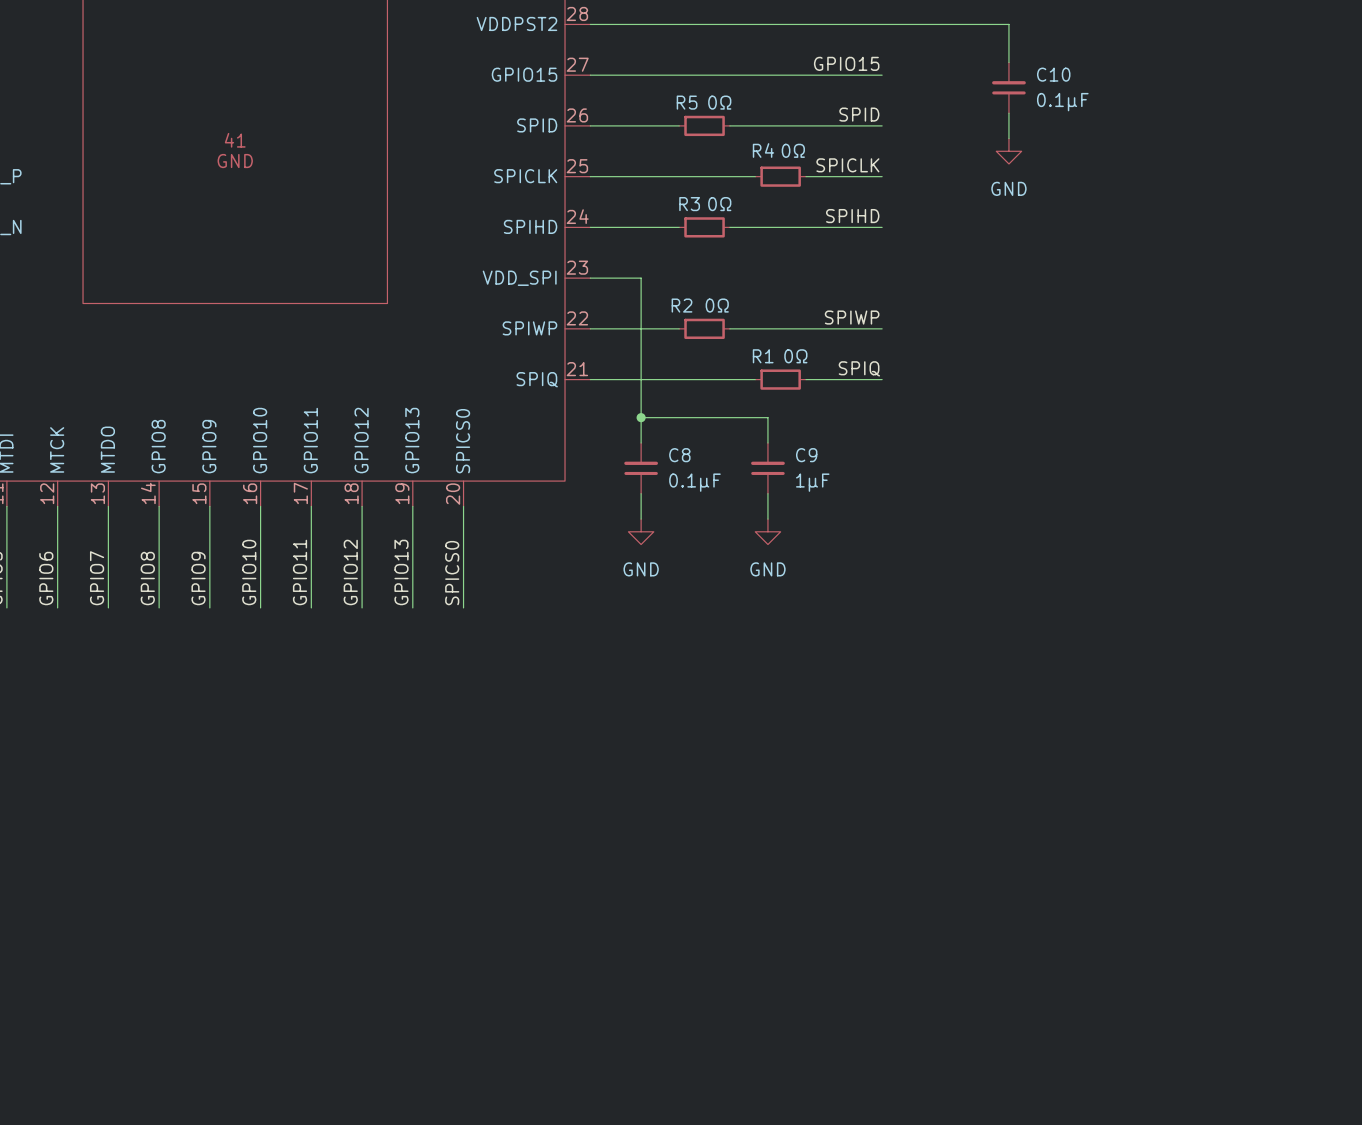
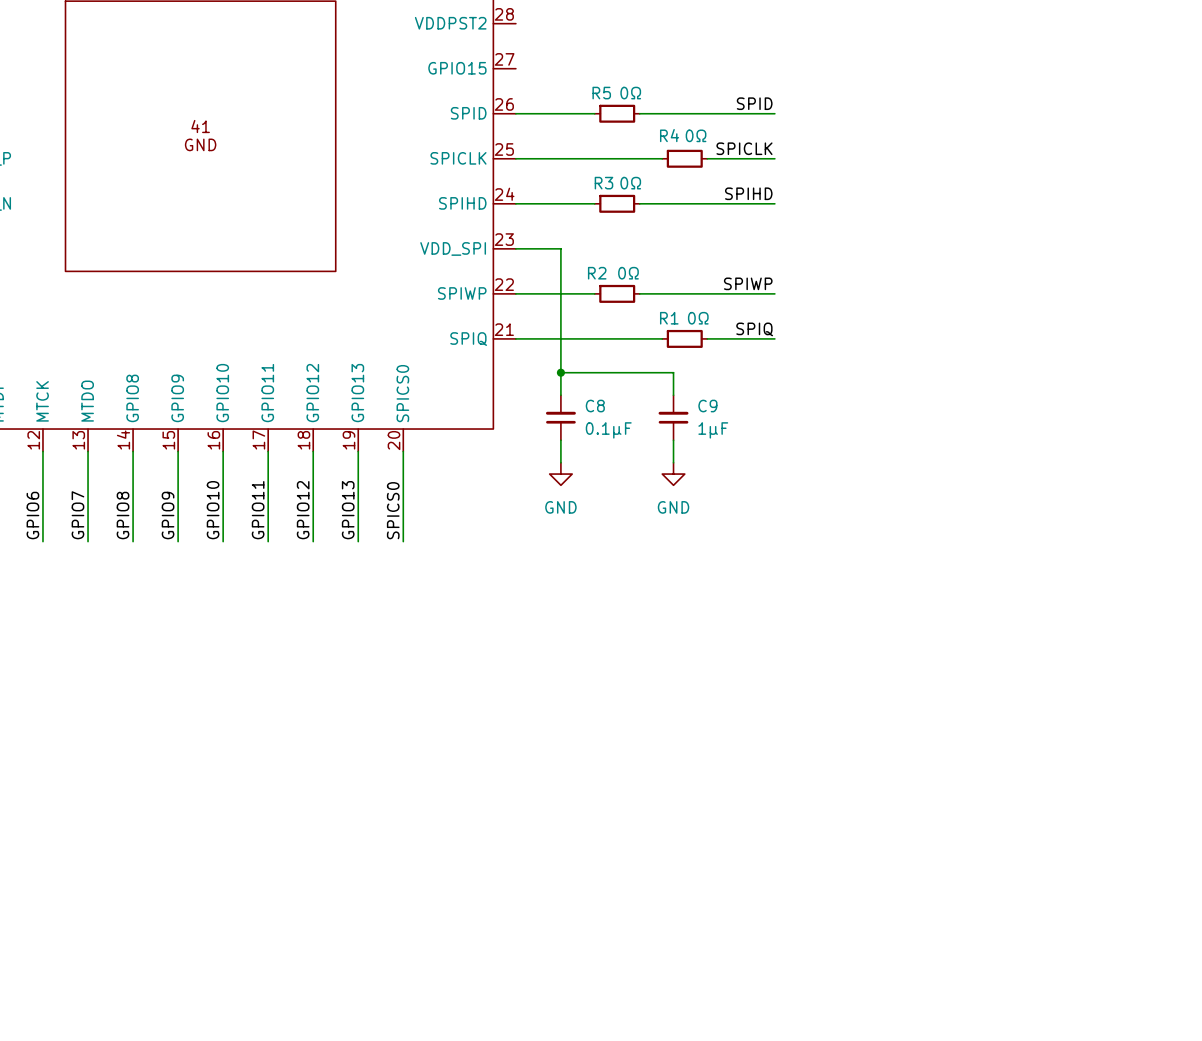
wire: (590, 24) (1008, 24) (1008, 62) -> none
label: GPIO15 (846, 63) -> none
wire: (590, 75) (882, 75) -> none
C10: (1008, 87) -> none
wire: (1008, 113) (1008, 138) -> none
power symbol: GND (1008, 151) -> none

